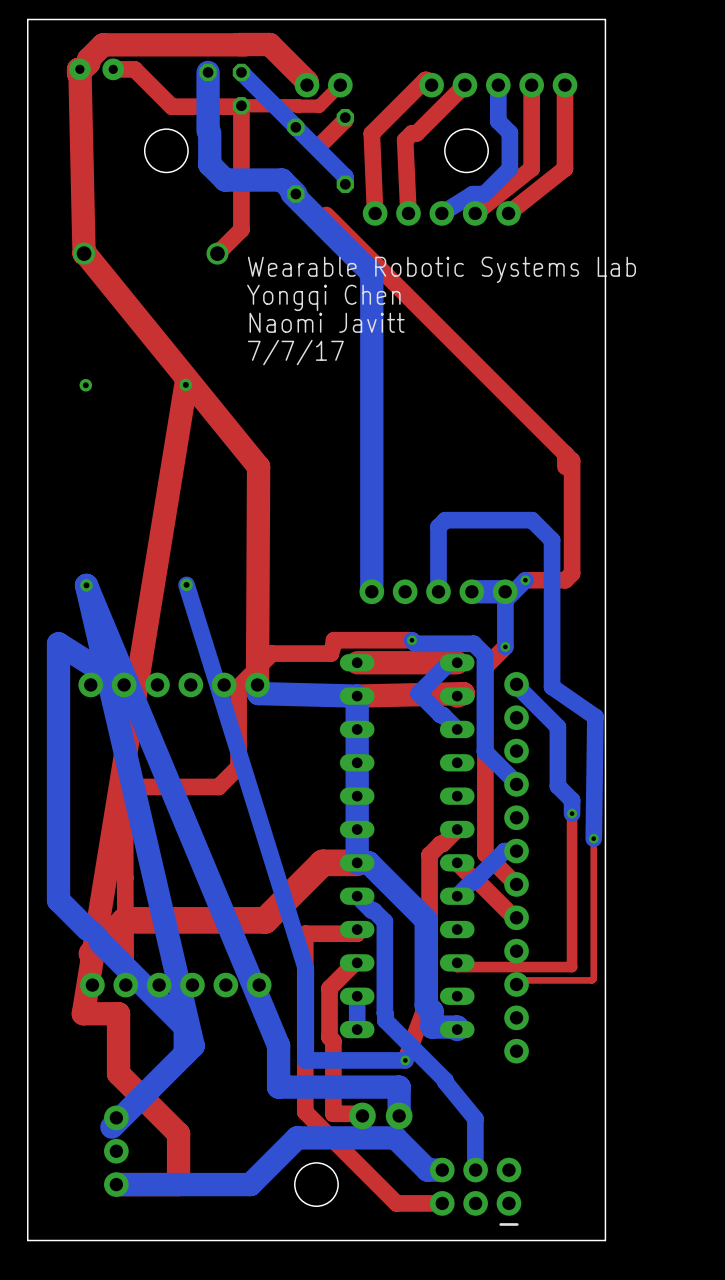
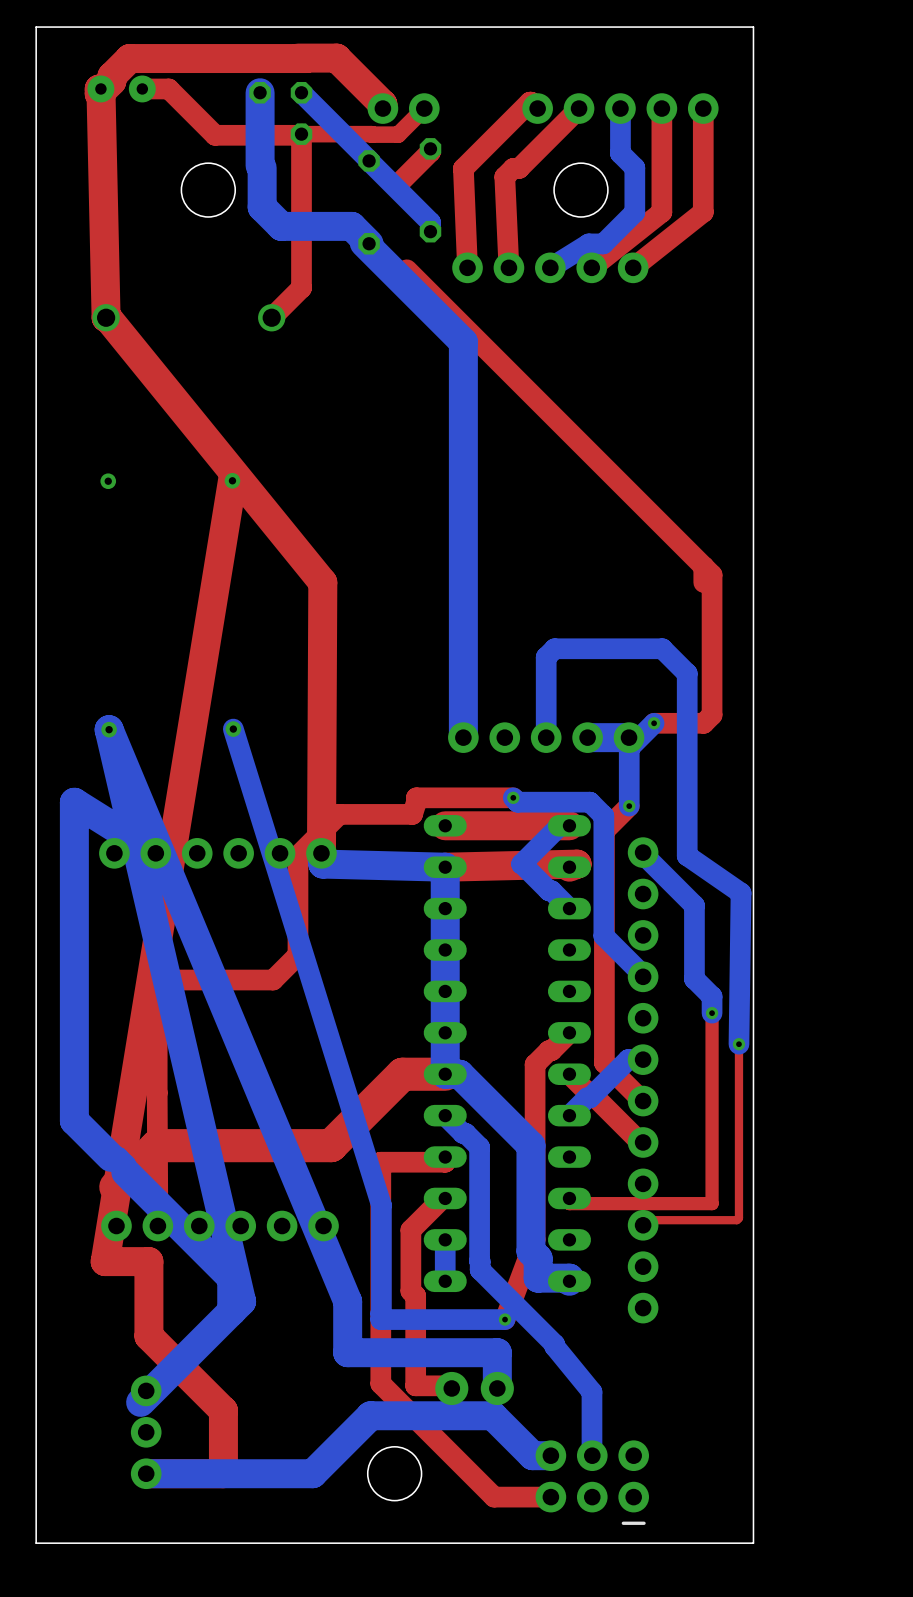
text: Wearable Robotic Systems Lab (441, 269) -> none
text: Yongqi Chen (323, 297) -> none
text: Naomi Javitt (327, 322) -> none
text: 7/7/17 (295, 352) -> none

